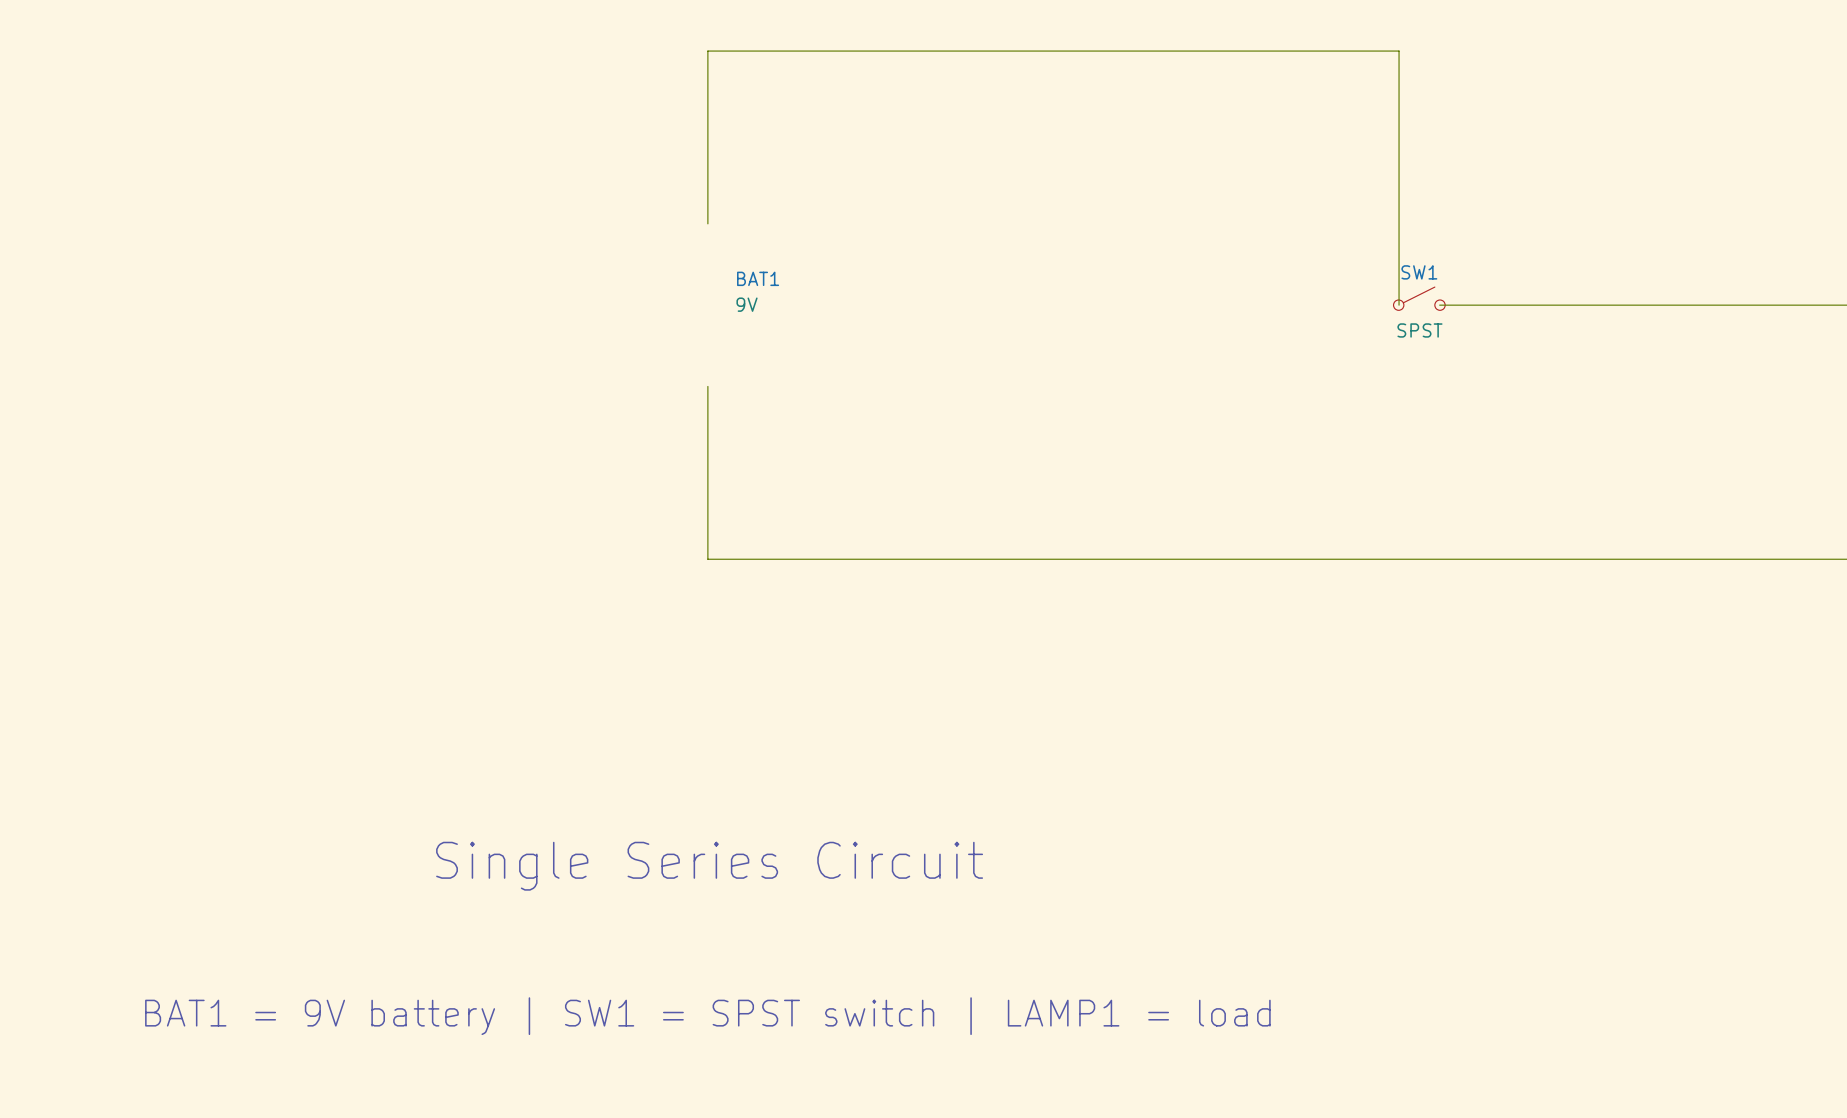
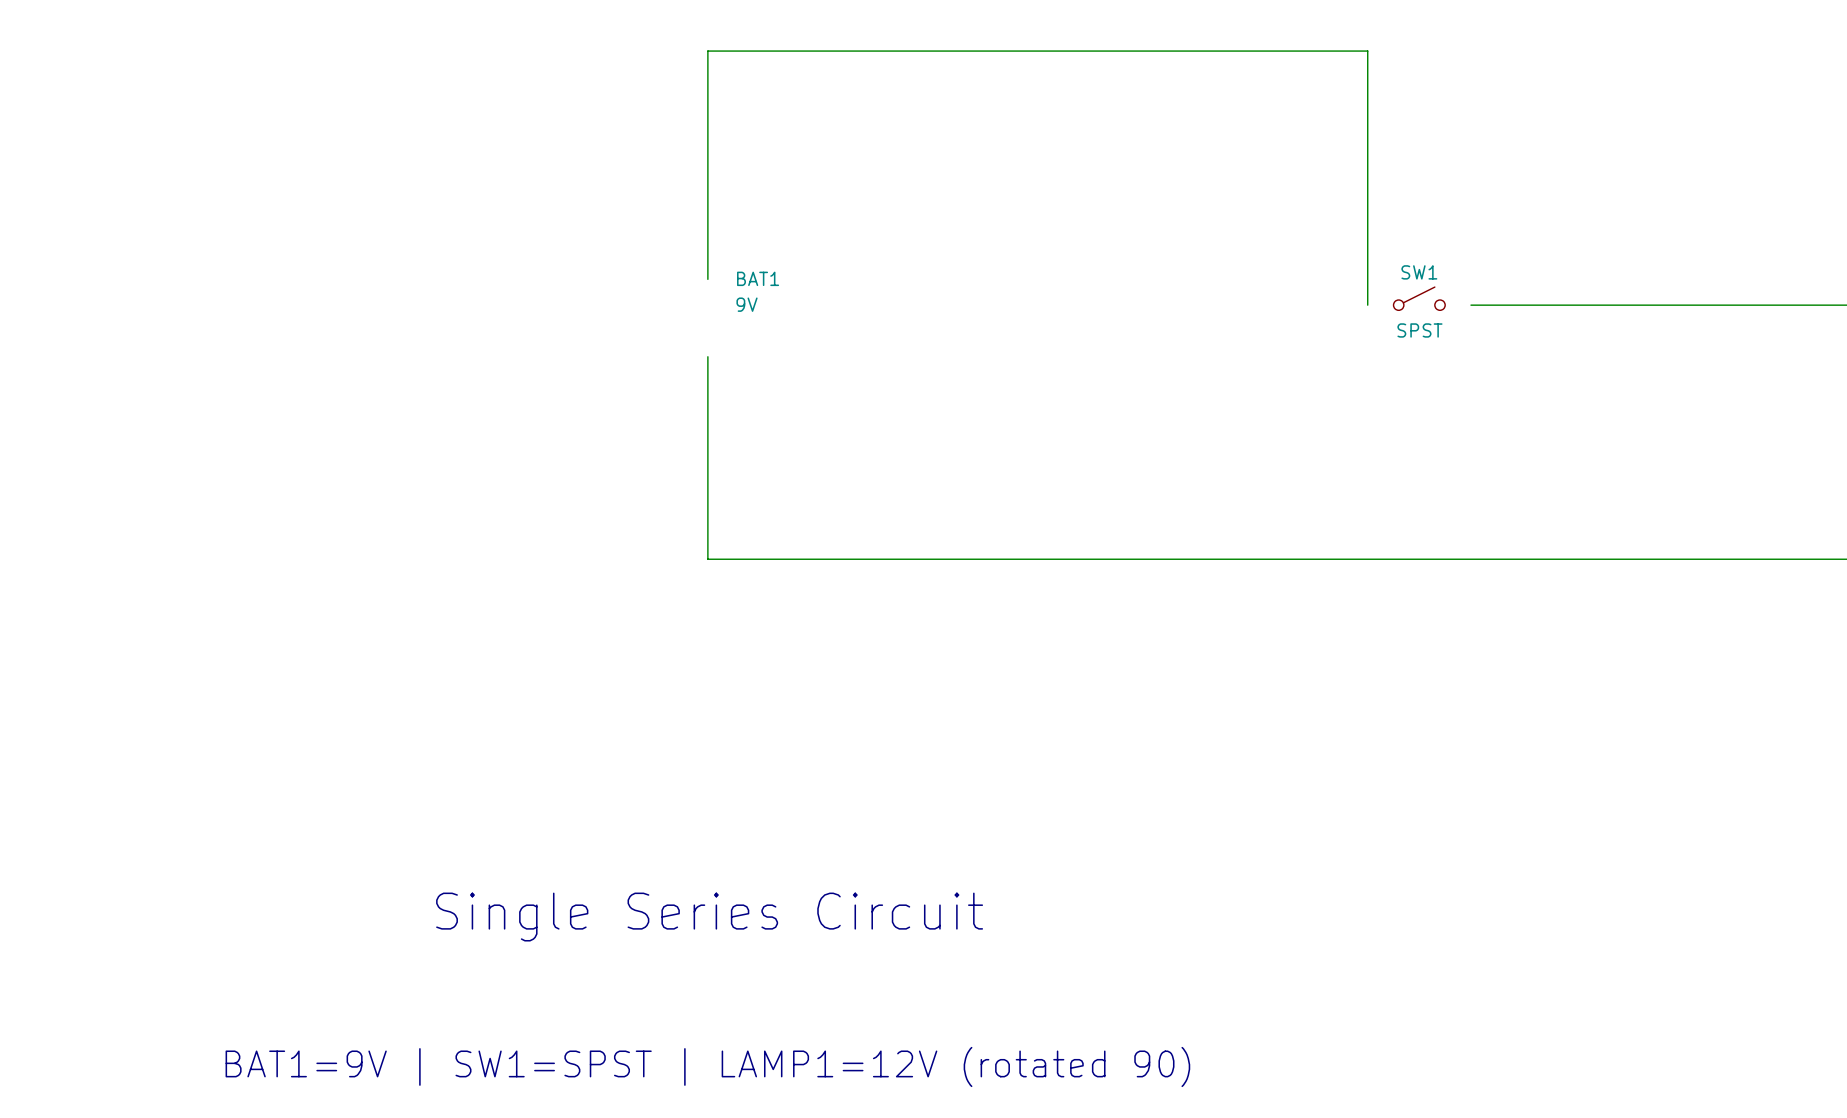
wire: (1367, 51) (1399, 51) (1399, 305) -> (1367, 51) (1367, 305)
wire: none -> (707, 223) (707, 279)
wire: (1439, 305) (1470, 305) -> none
wire: none -> (707, 356) (707, 386)
text position: Single Series Circuit (709, 866) -> Single Series Circuit (709, 917)
text: BAT1 = 9V battery | SW1 = SPST switch | LAMP1 = load (707, 1016) -> none
text: none -> BAT1=9V | SW1=SPST | LAMP1=12V (rotated 90) (707, 1066)

